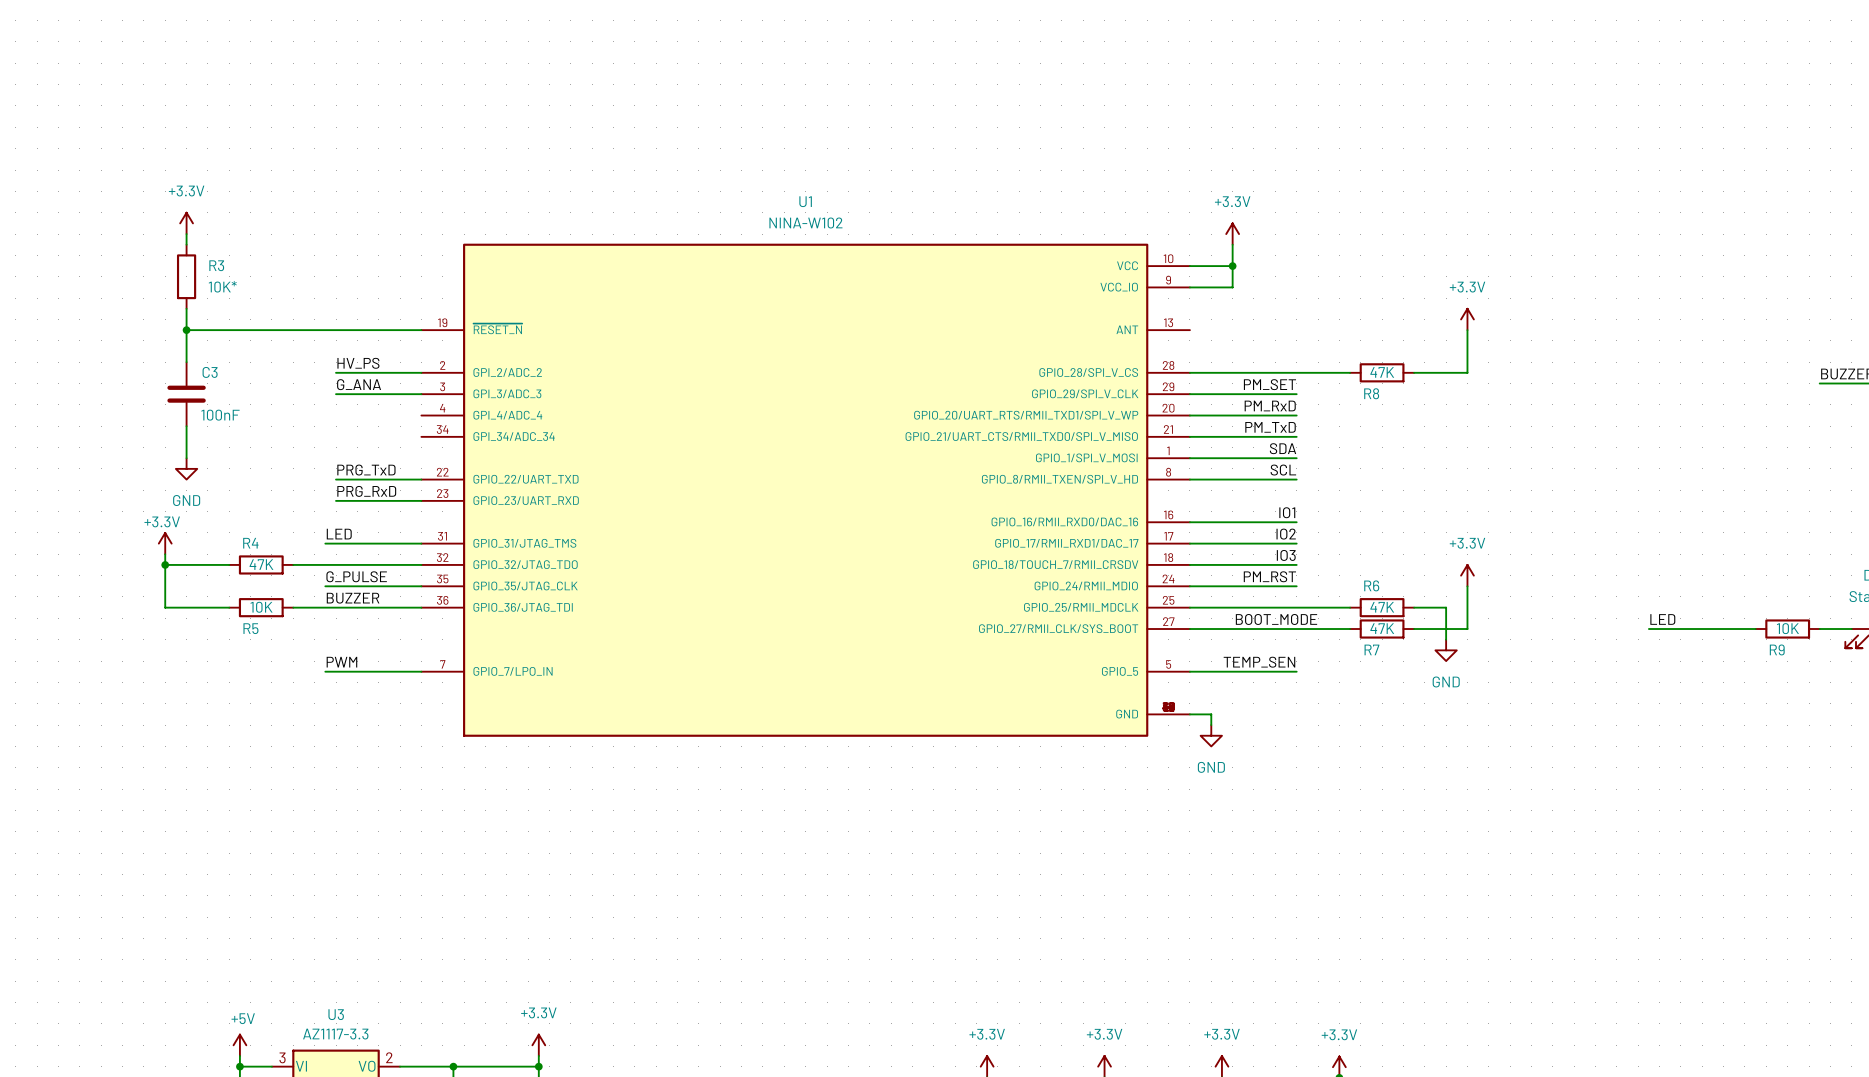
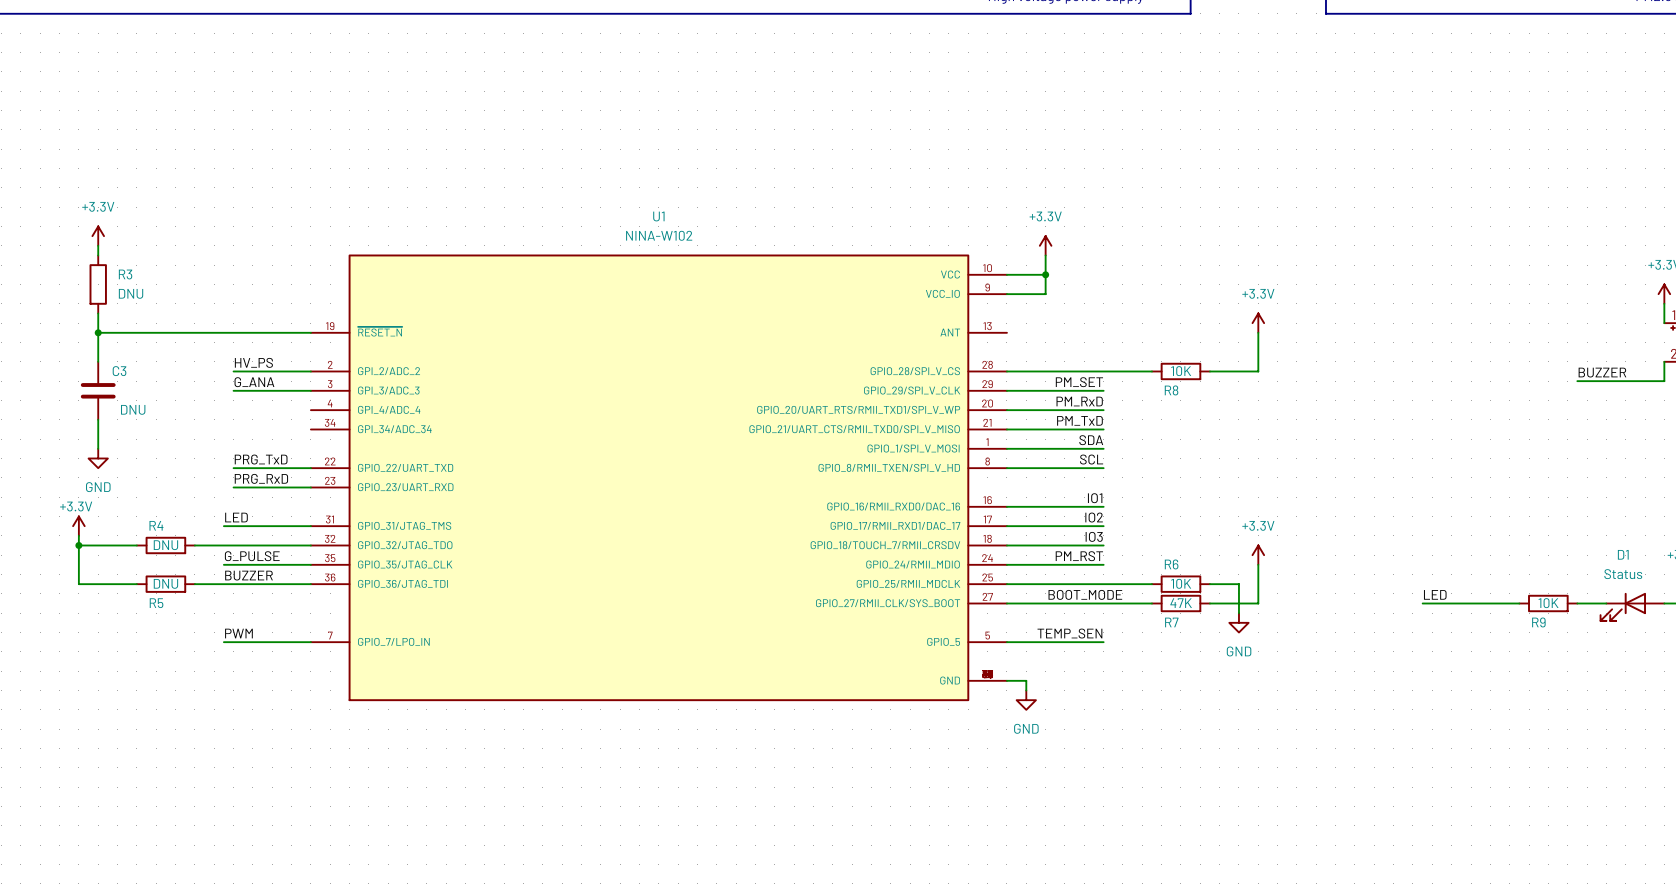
R3 value: 10K* (222, 286) -> DNU (131, 293)
R8 value: 47K (1382, 372) -> 10K (1181, 371)
C3 value: 100nF (220, 415) -> DNU (133, 409)
R4 value: 47K (261, 564) -> DNU (165, 545)
R5 value: 10K (261, 607) -> DNU (165, 583)
R6 value: 47K (1382, 607) -> 10K (1181, 583)

